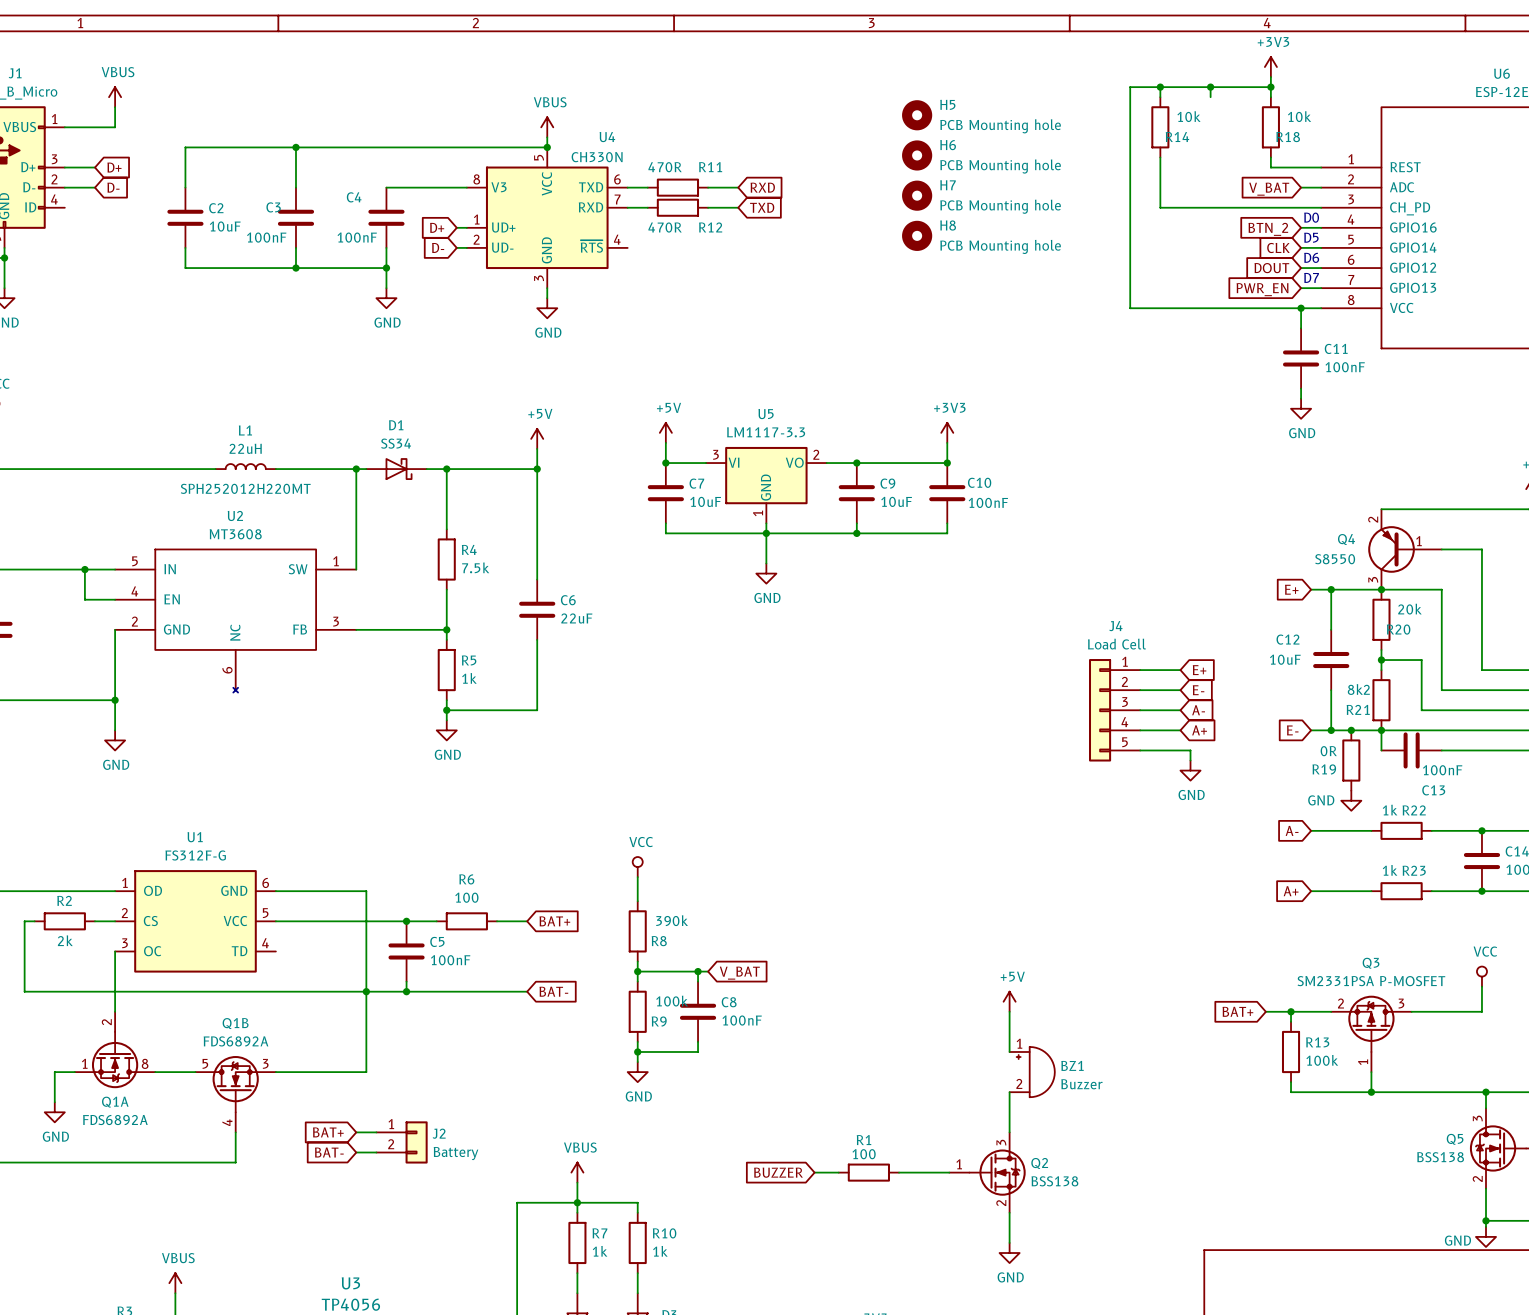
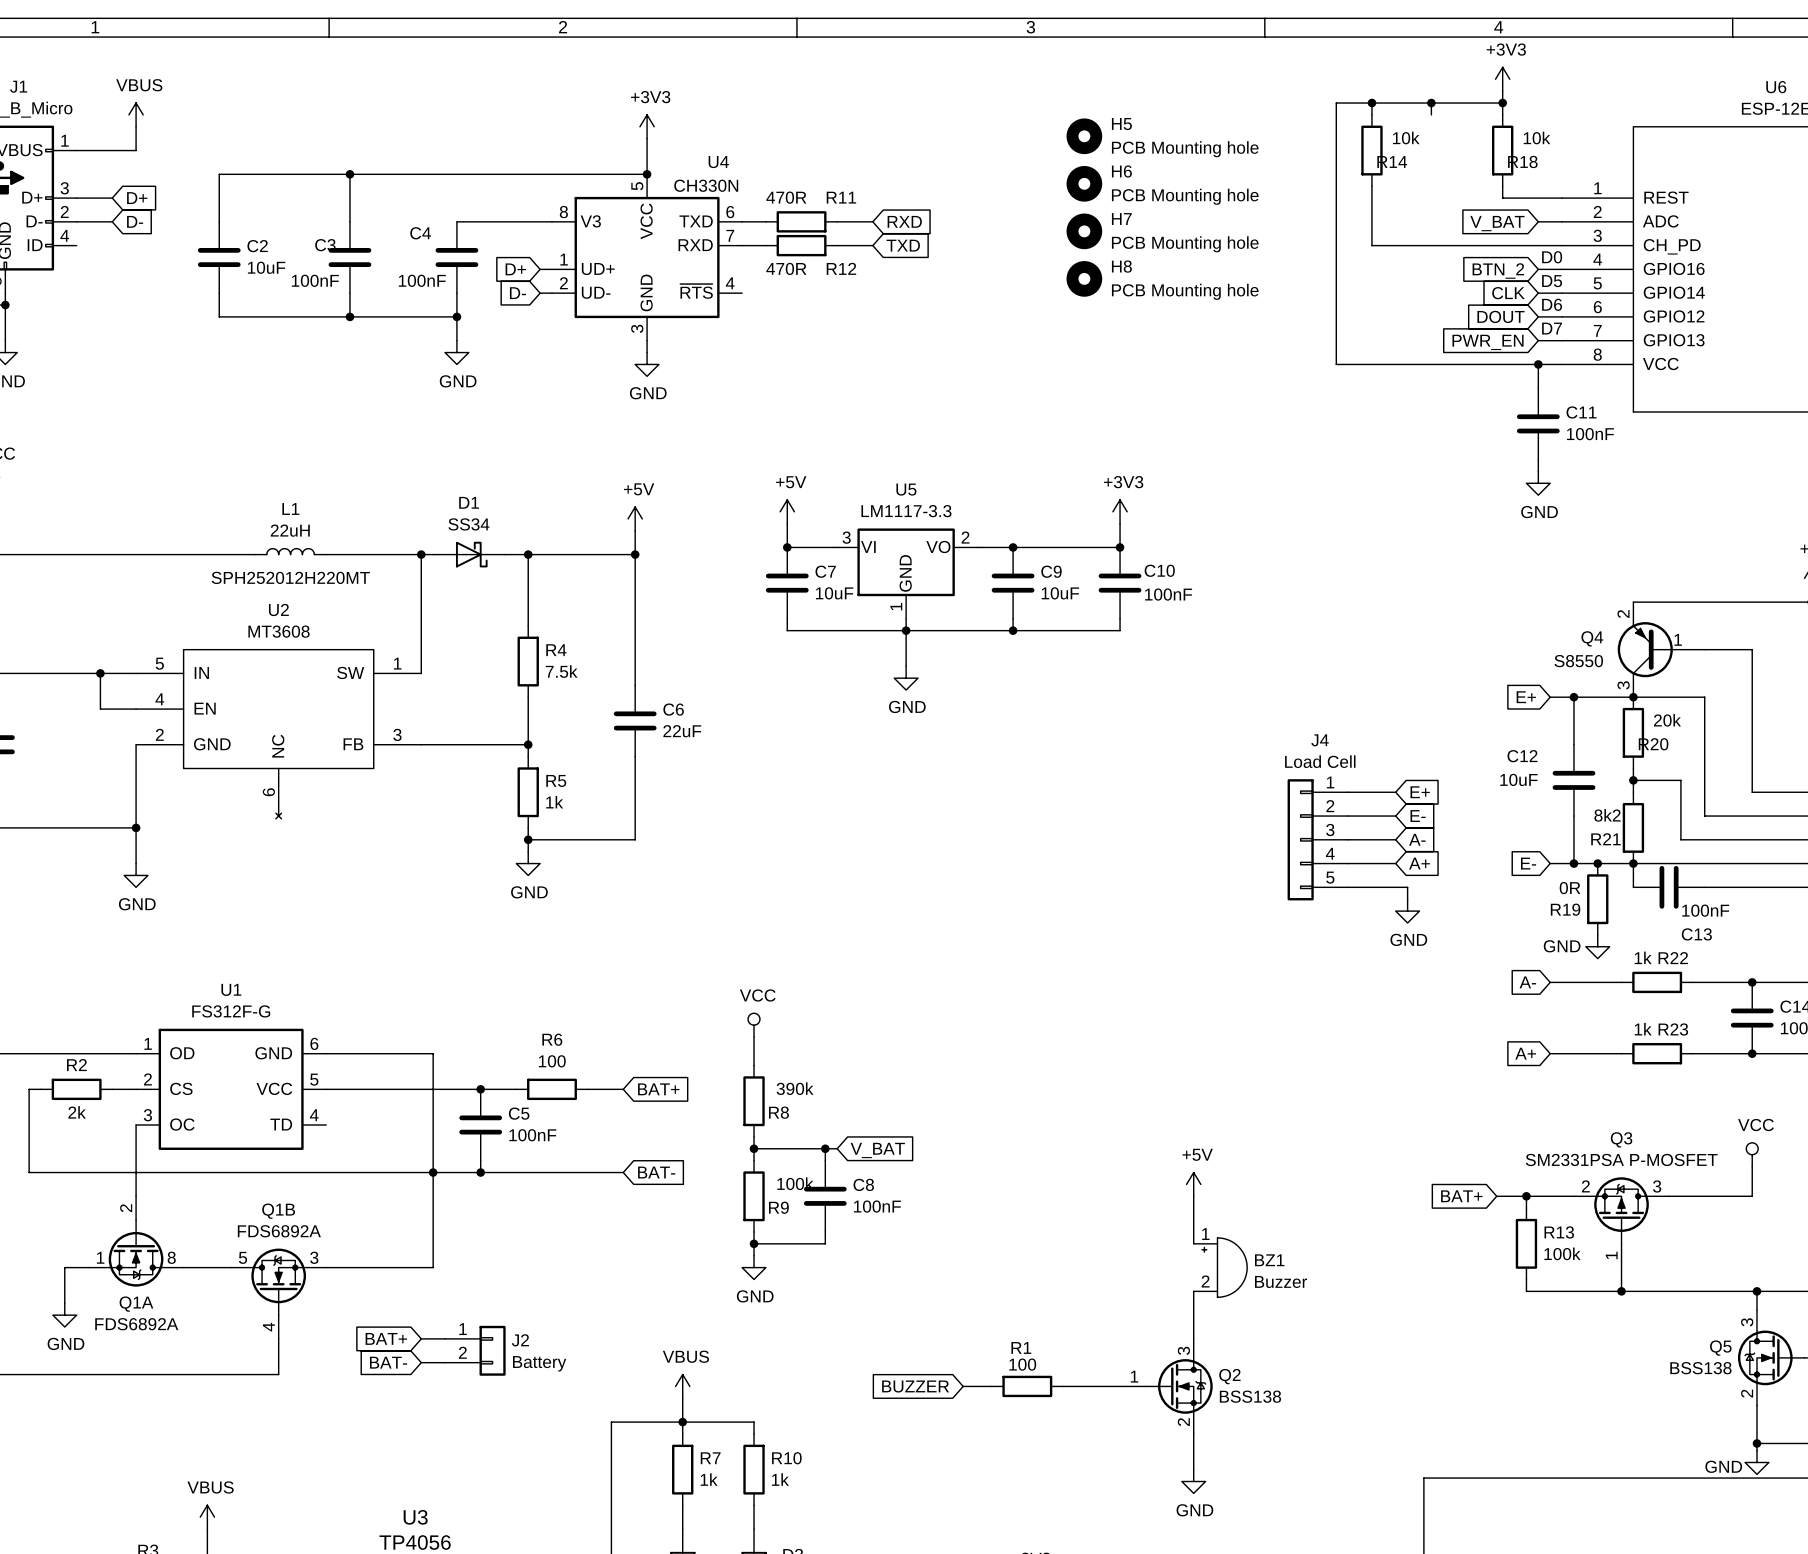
power symbol: none -> +3V3 (647, 126)
power symbol: VBUS (547, 127) -> none

